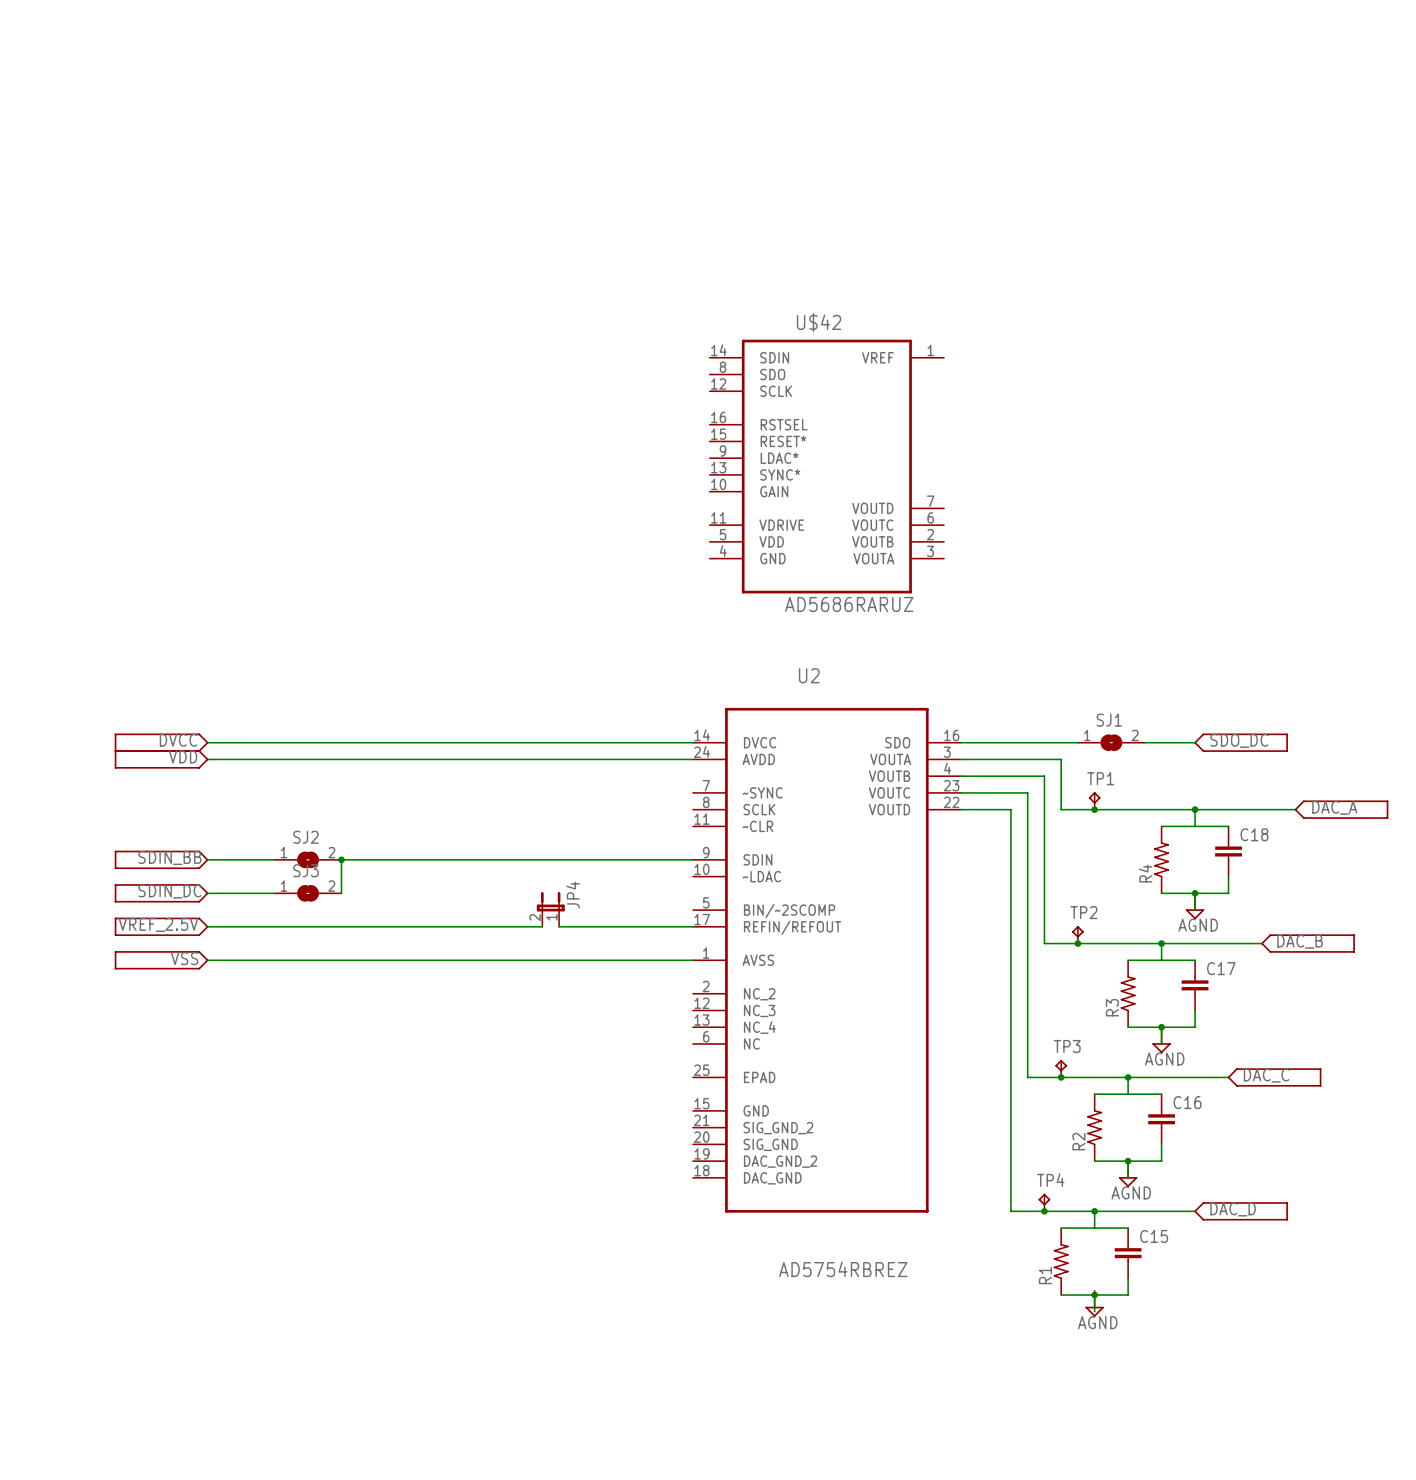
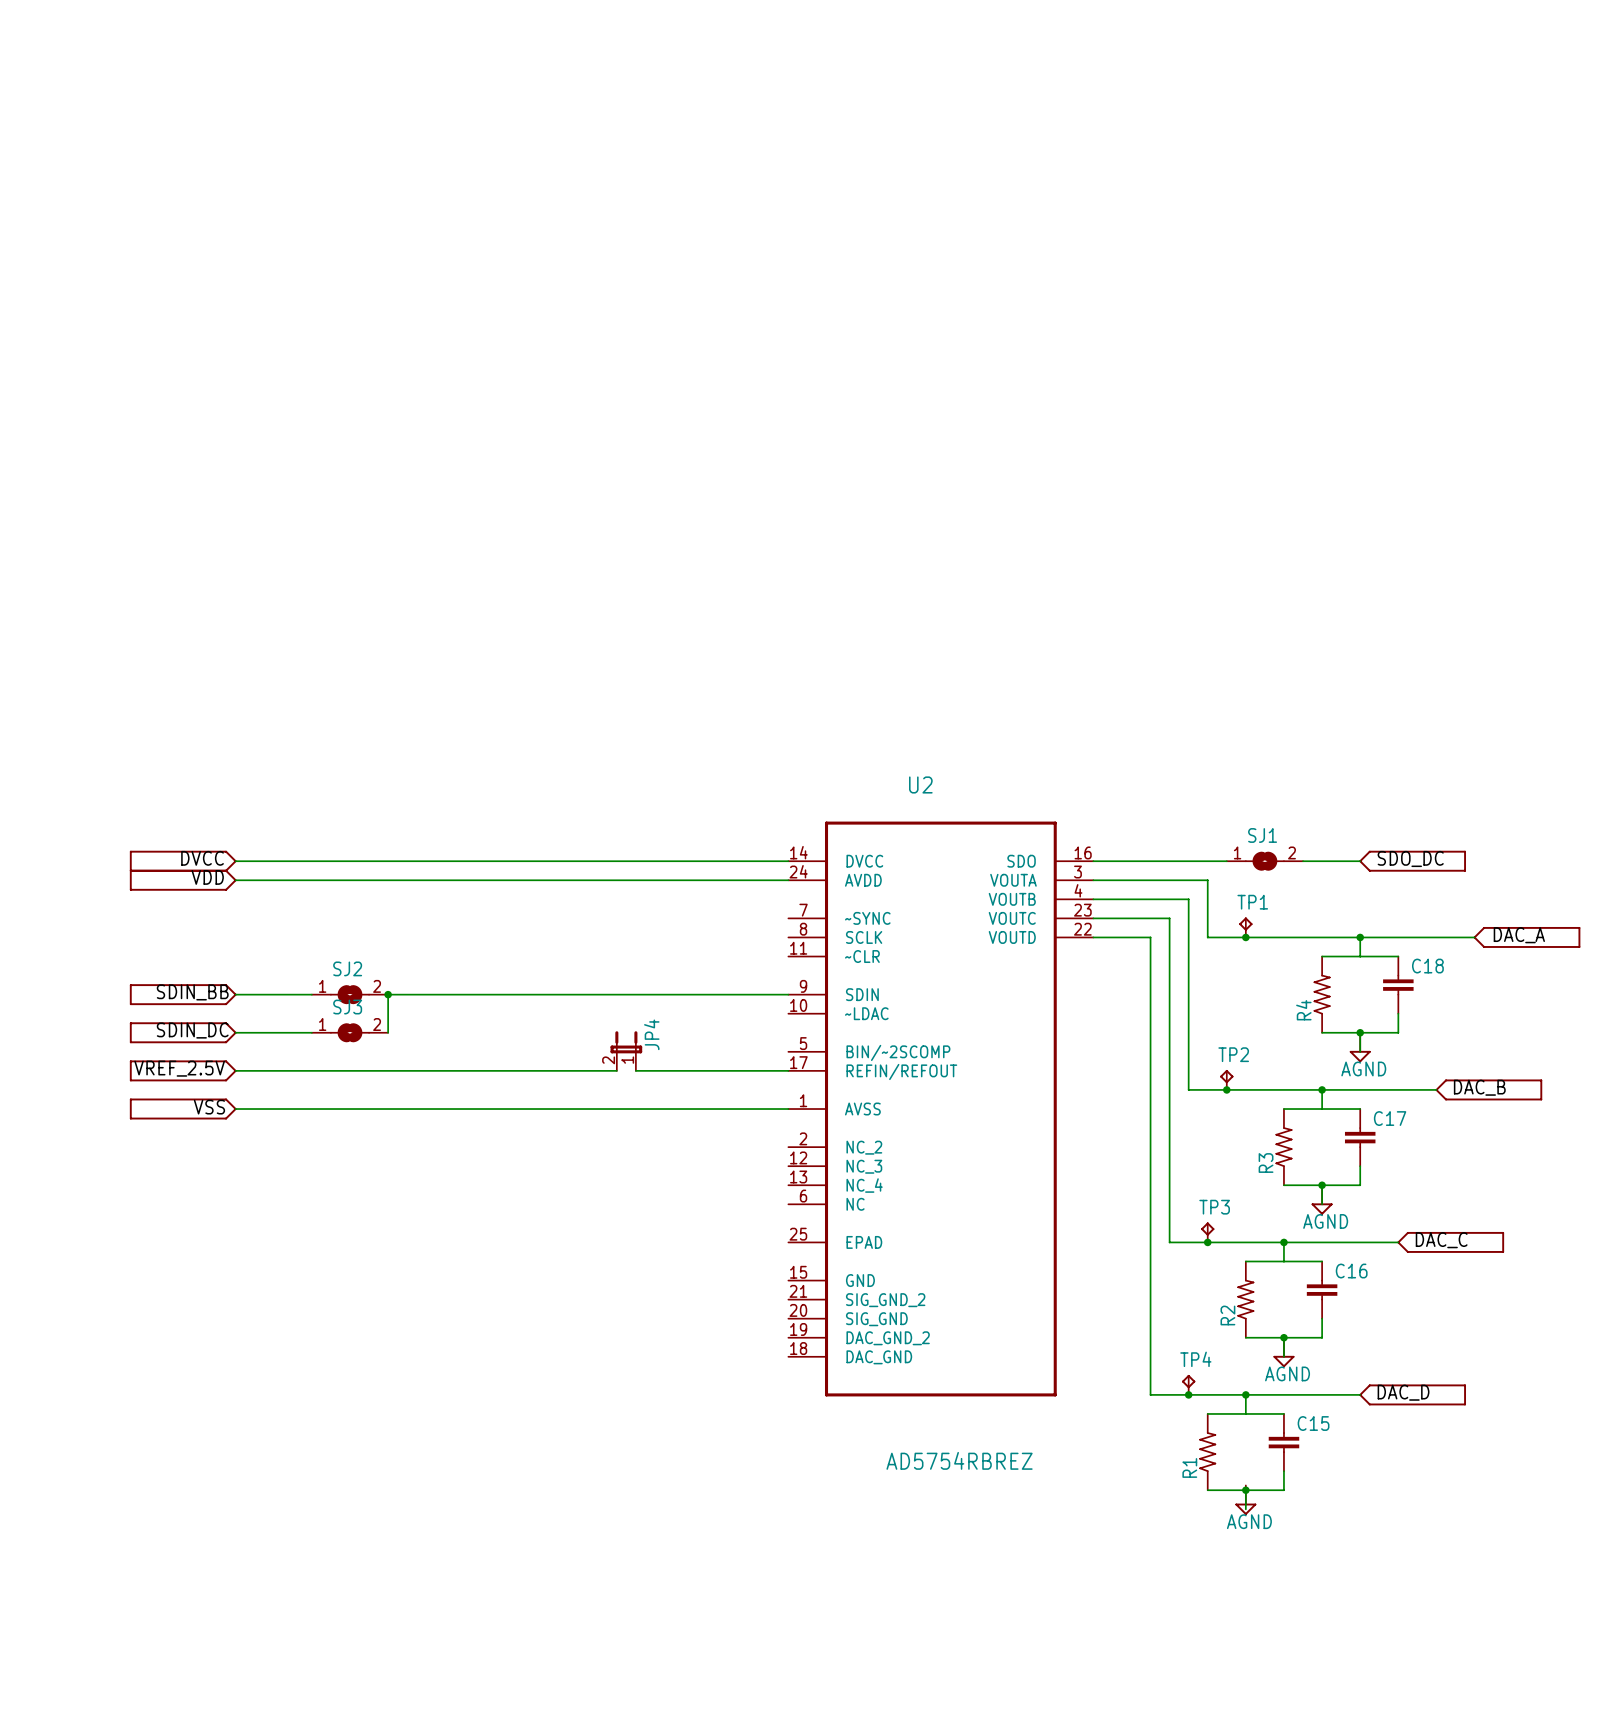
U$42: AD5686RARUZ (826, 466) -> none

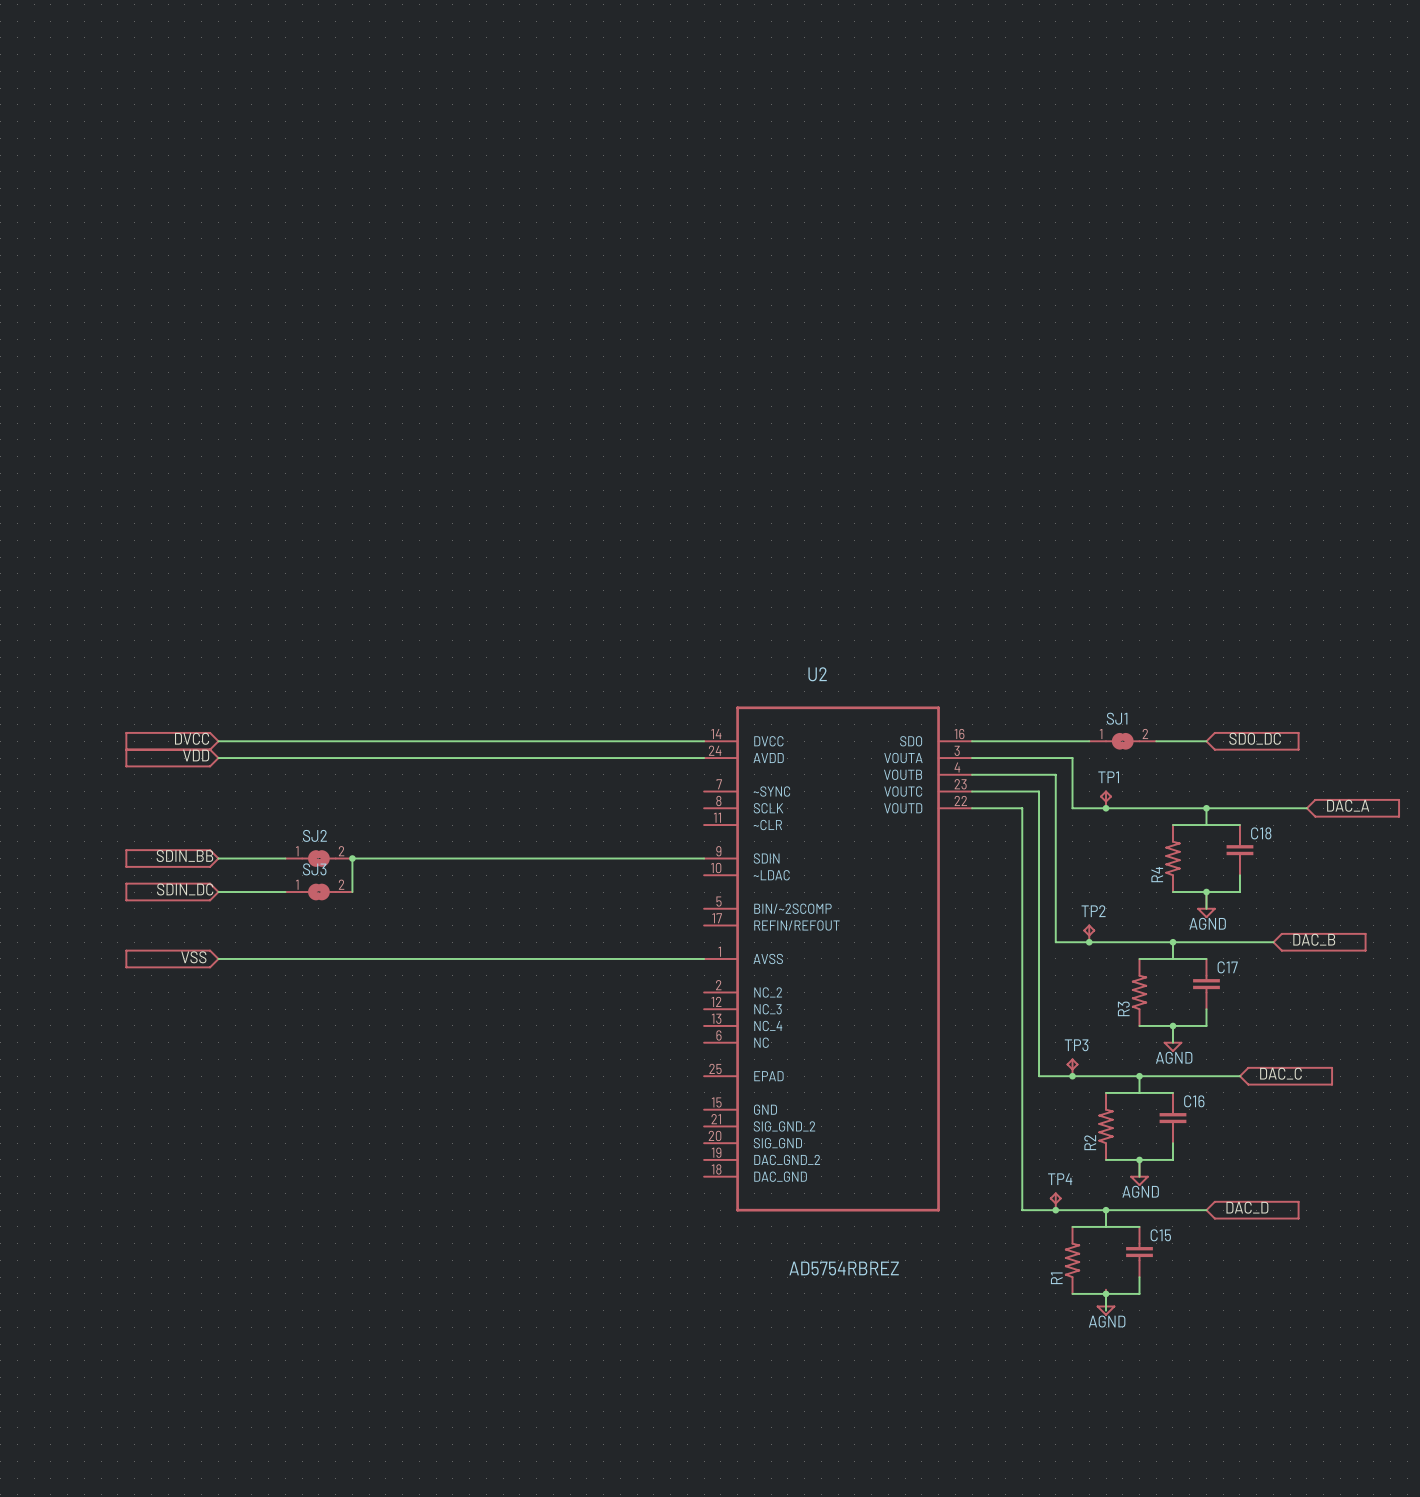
JP4: (626, 1051) -> none
label: VREF_2.5V (179, 1068) -> none
part: (183, 1070) -> none
wire: (235, 1070) (616, 1070) -> none
wire: (635, 1070) (788, 1070) -> none

